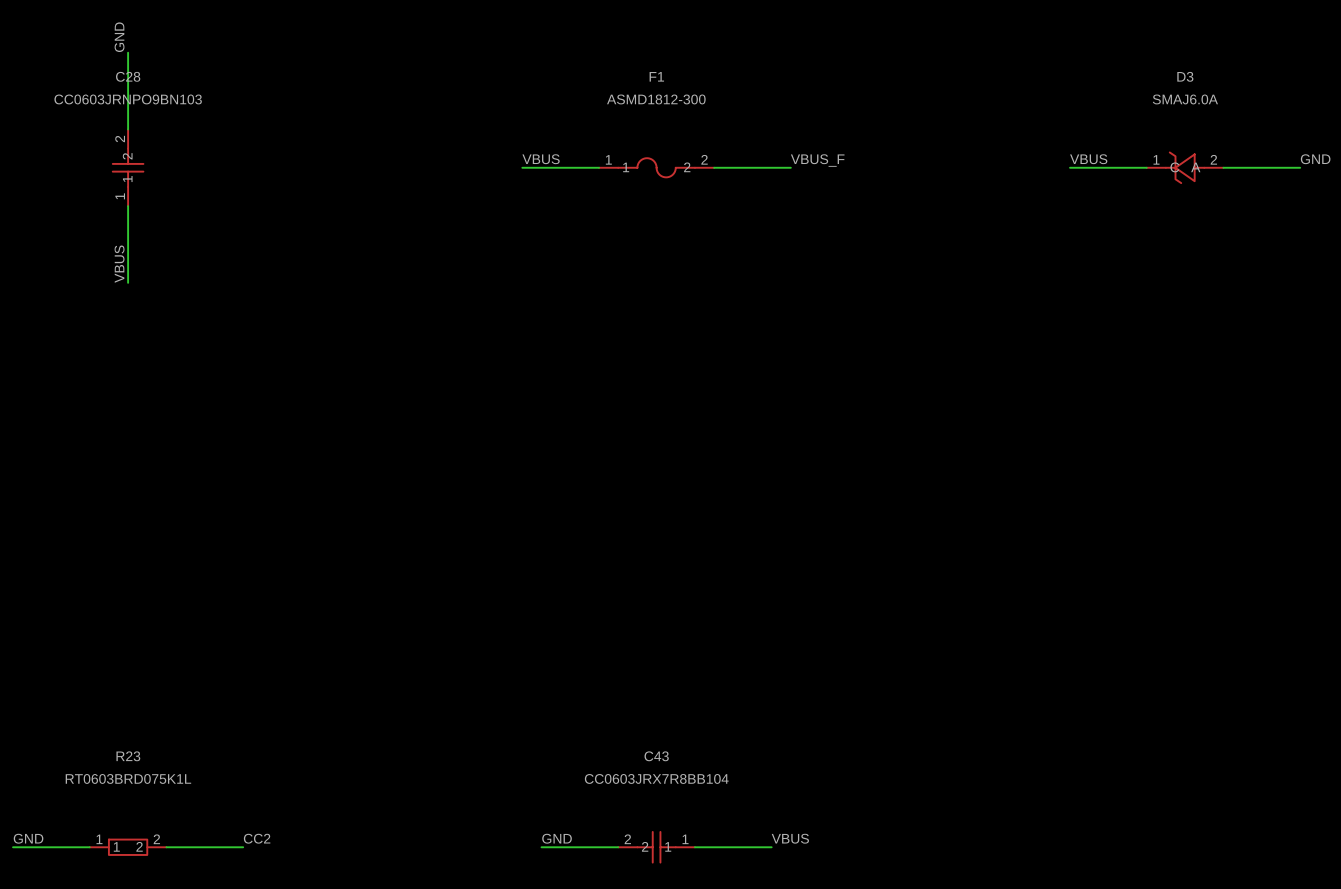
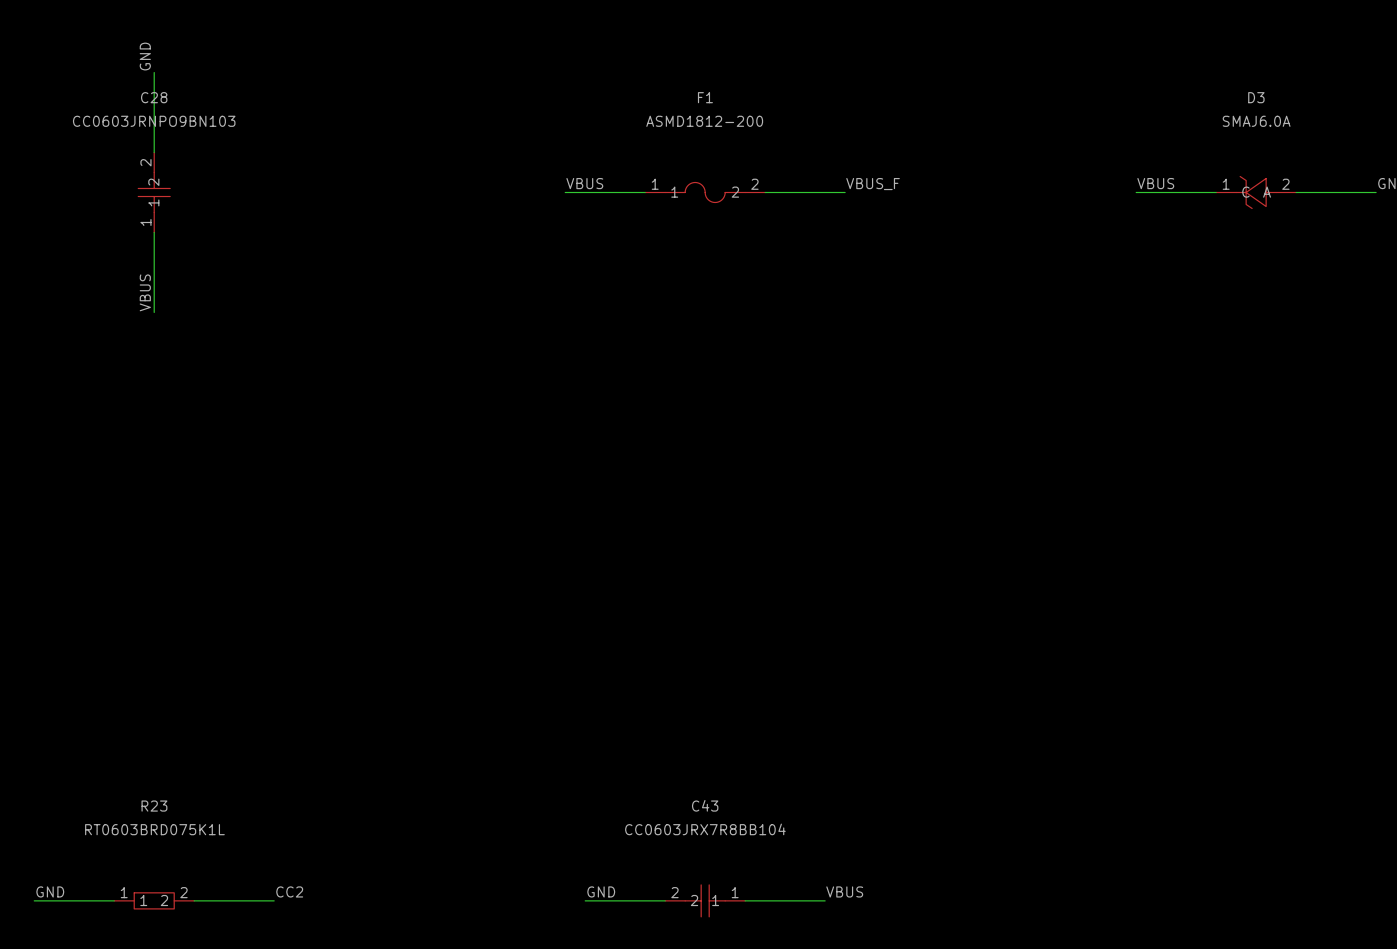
F1 value: ASMD1812-300 (656, 99) -> ASMD1812-200 (704, 121)

